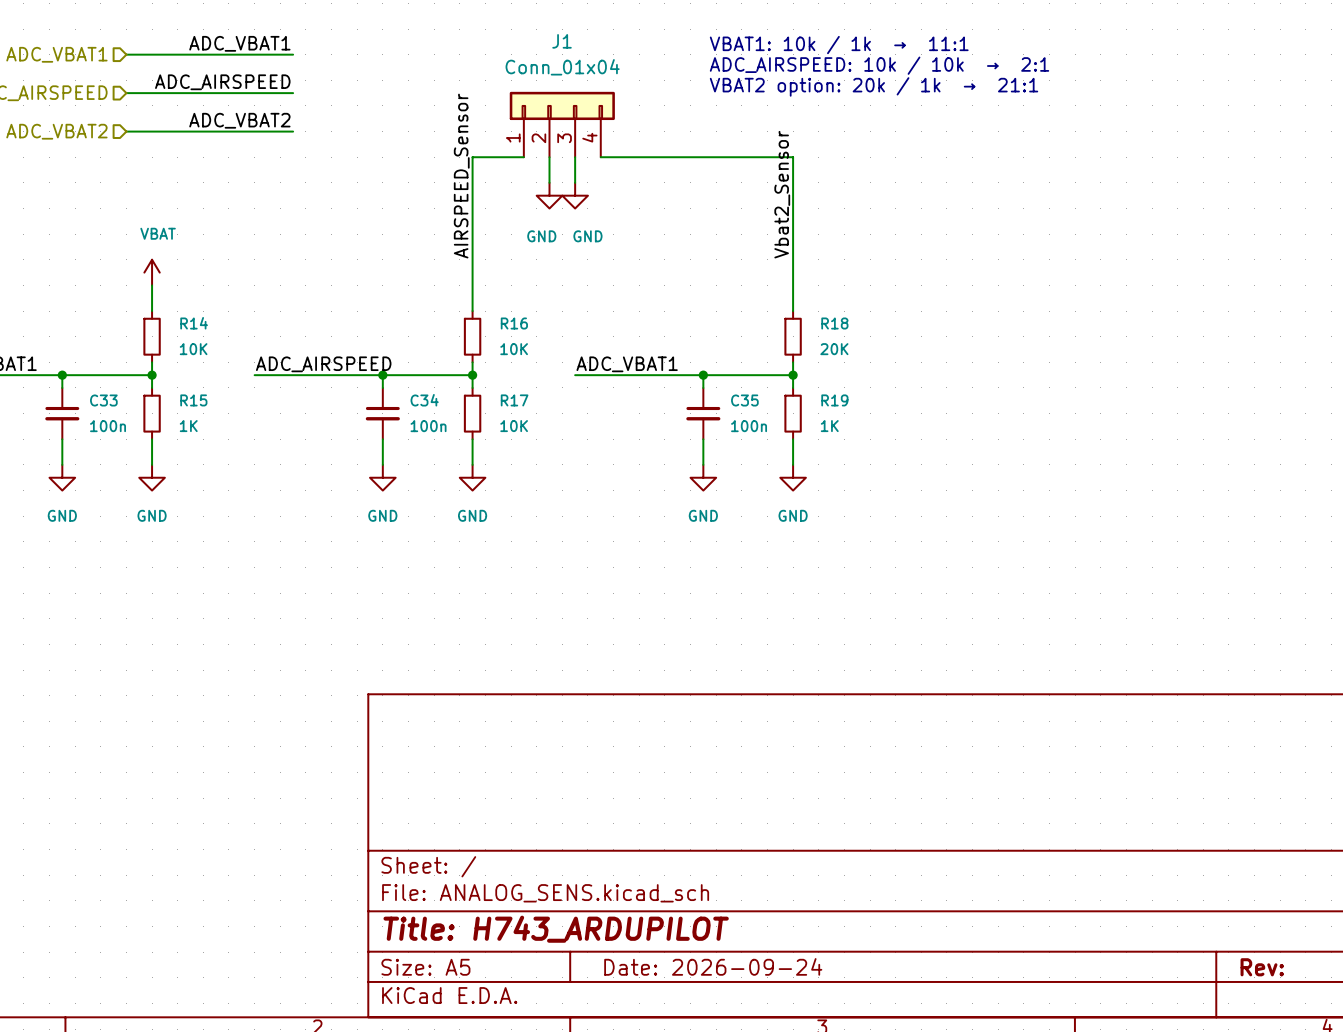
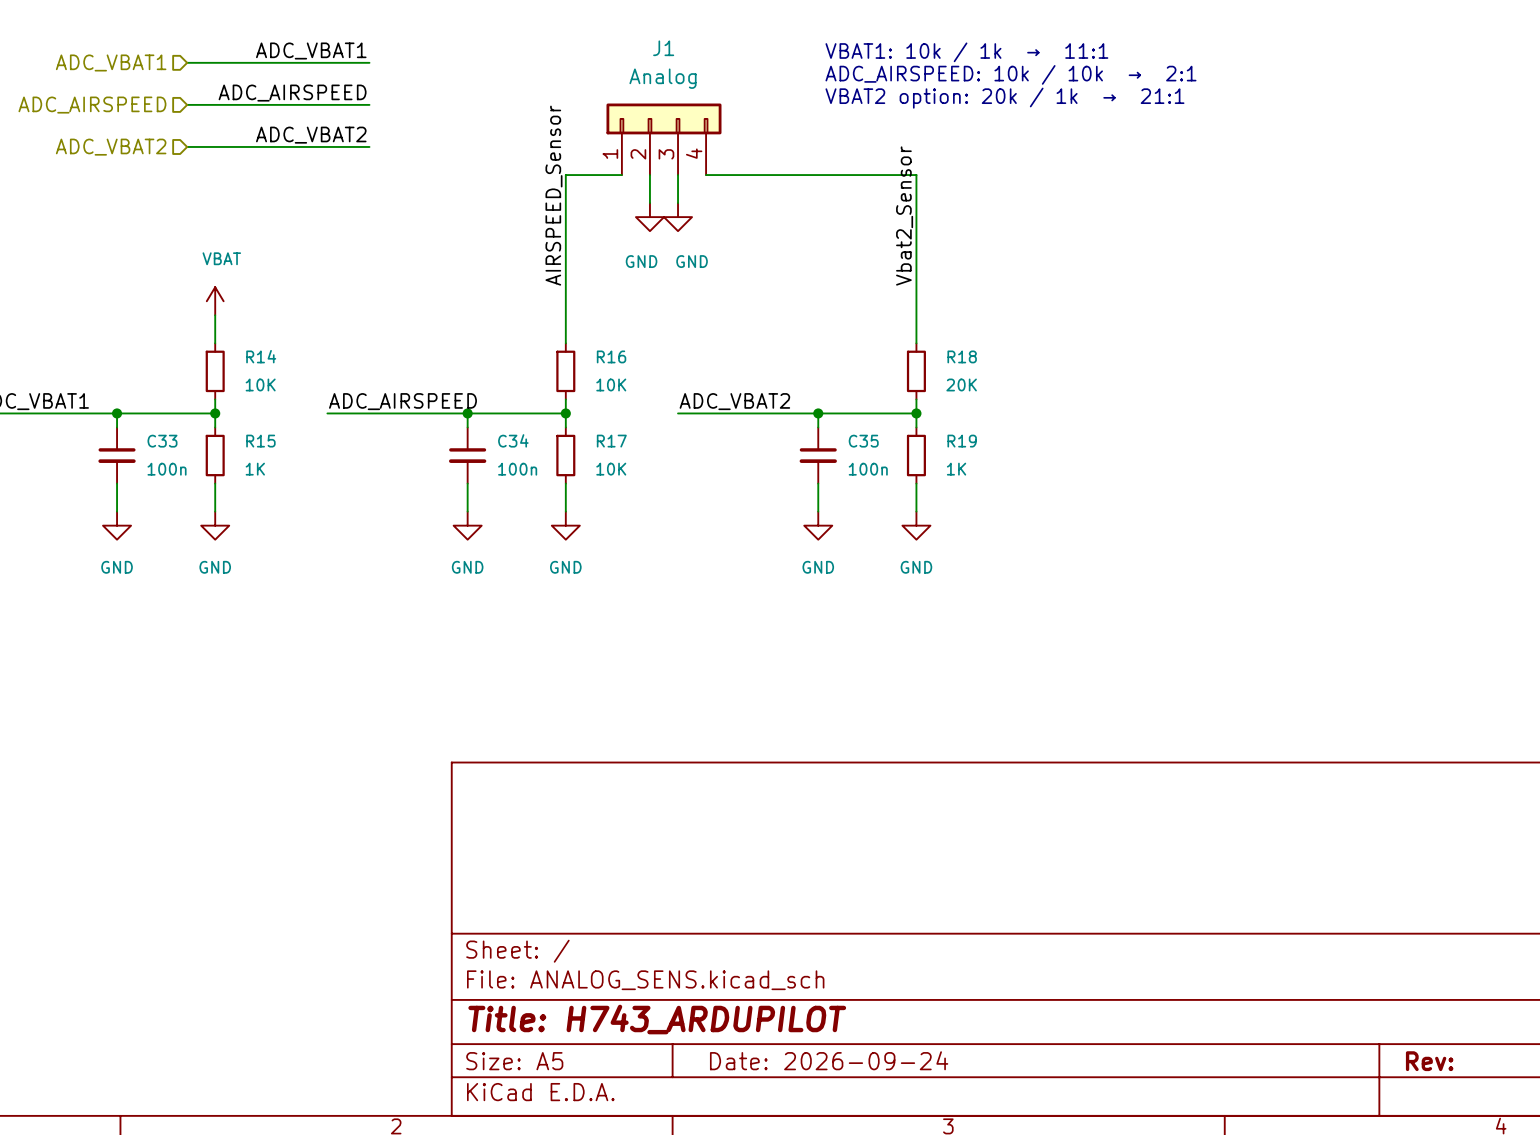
J1 value: Conn_01x04 (562, 67) -> Analog (662, 78)
label: ADC_VBAT1 (627, 364) -> ADC_VBAT2 (734, 401)

